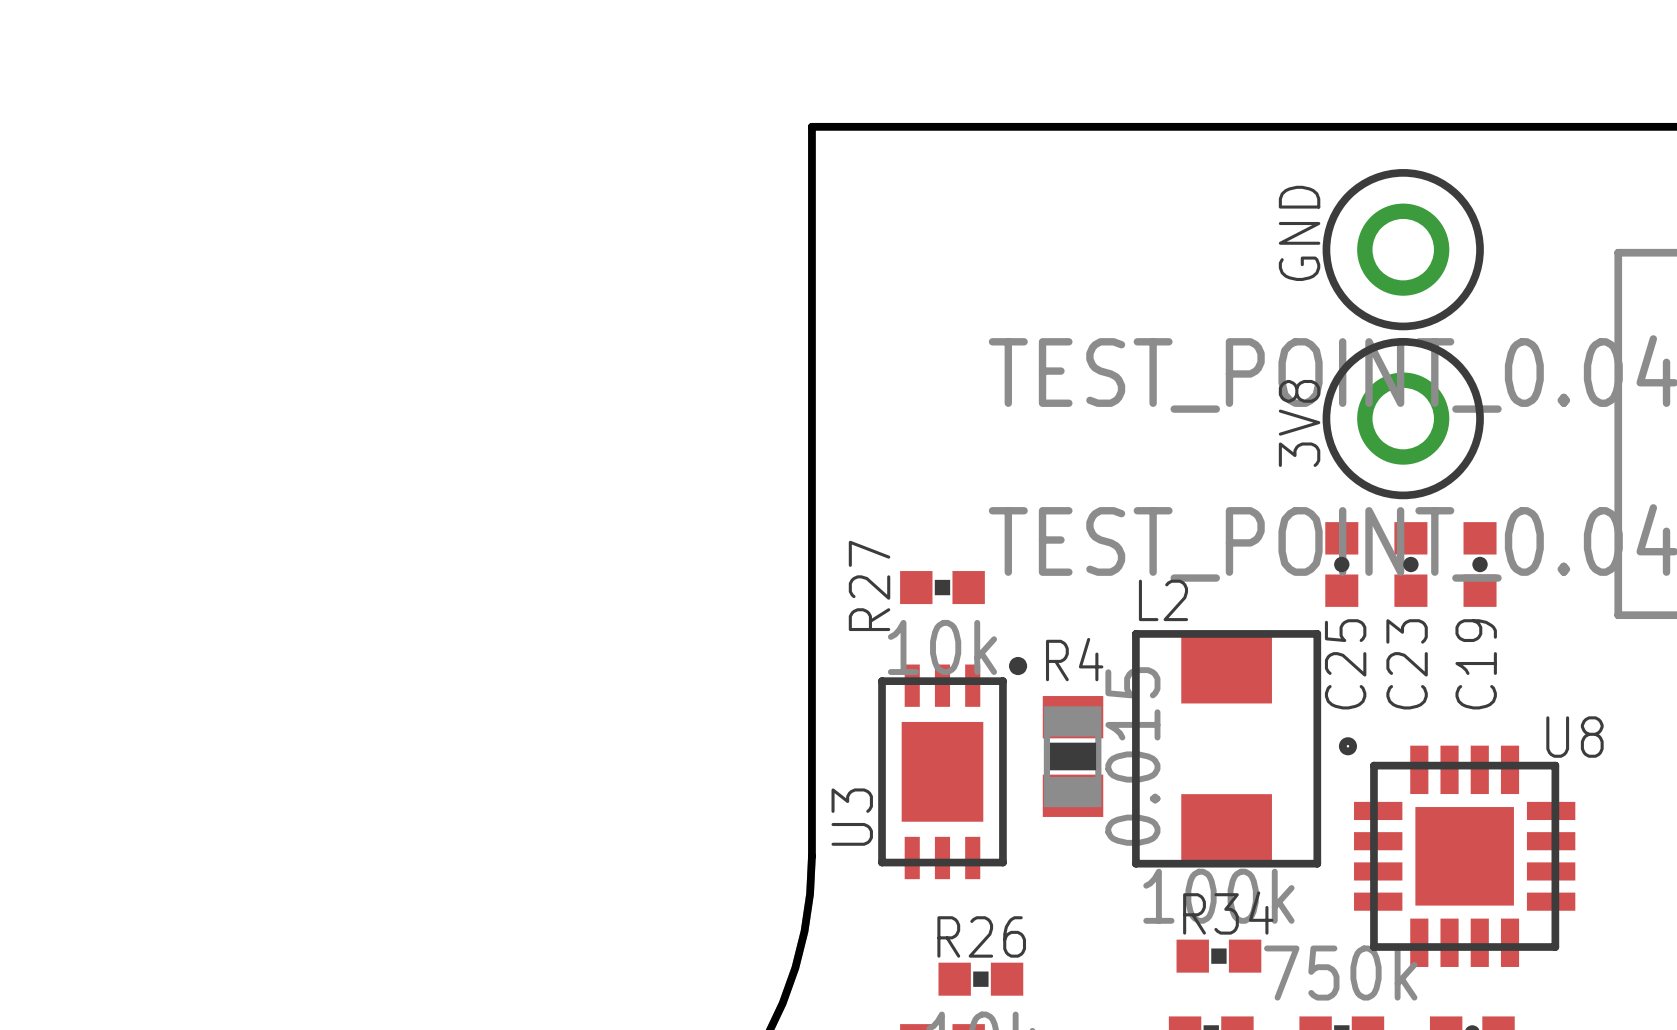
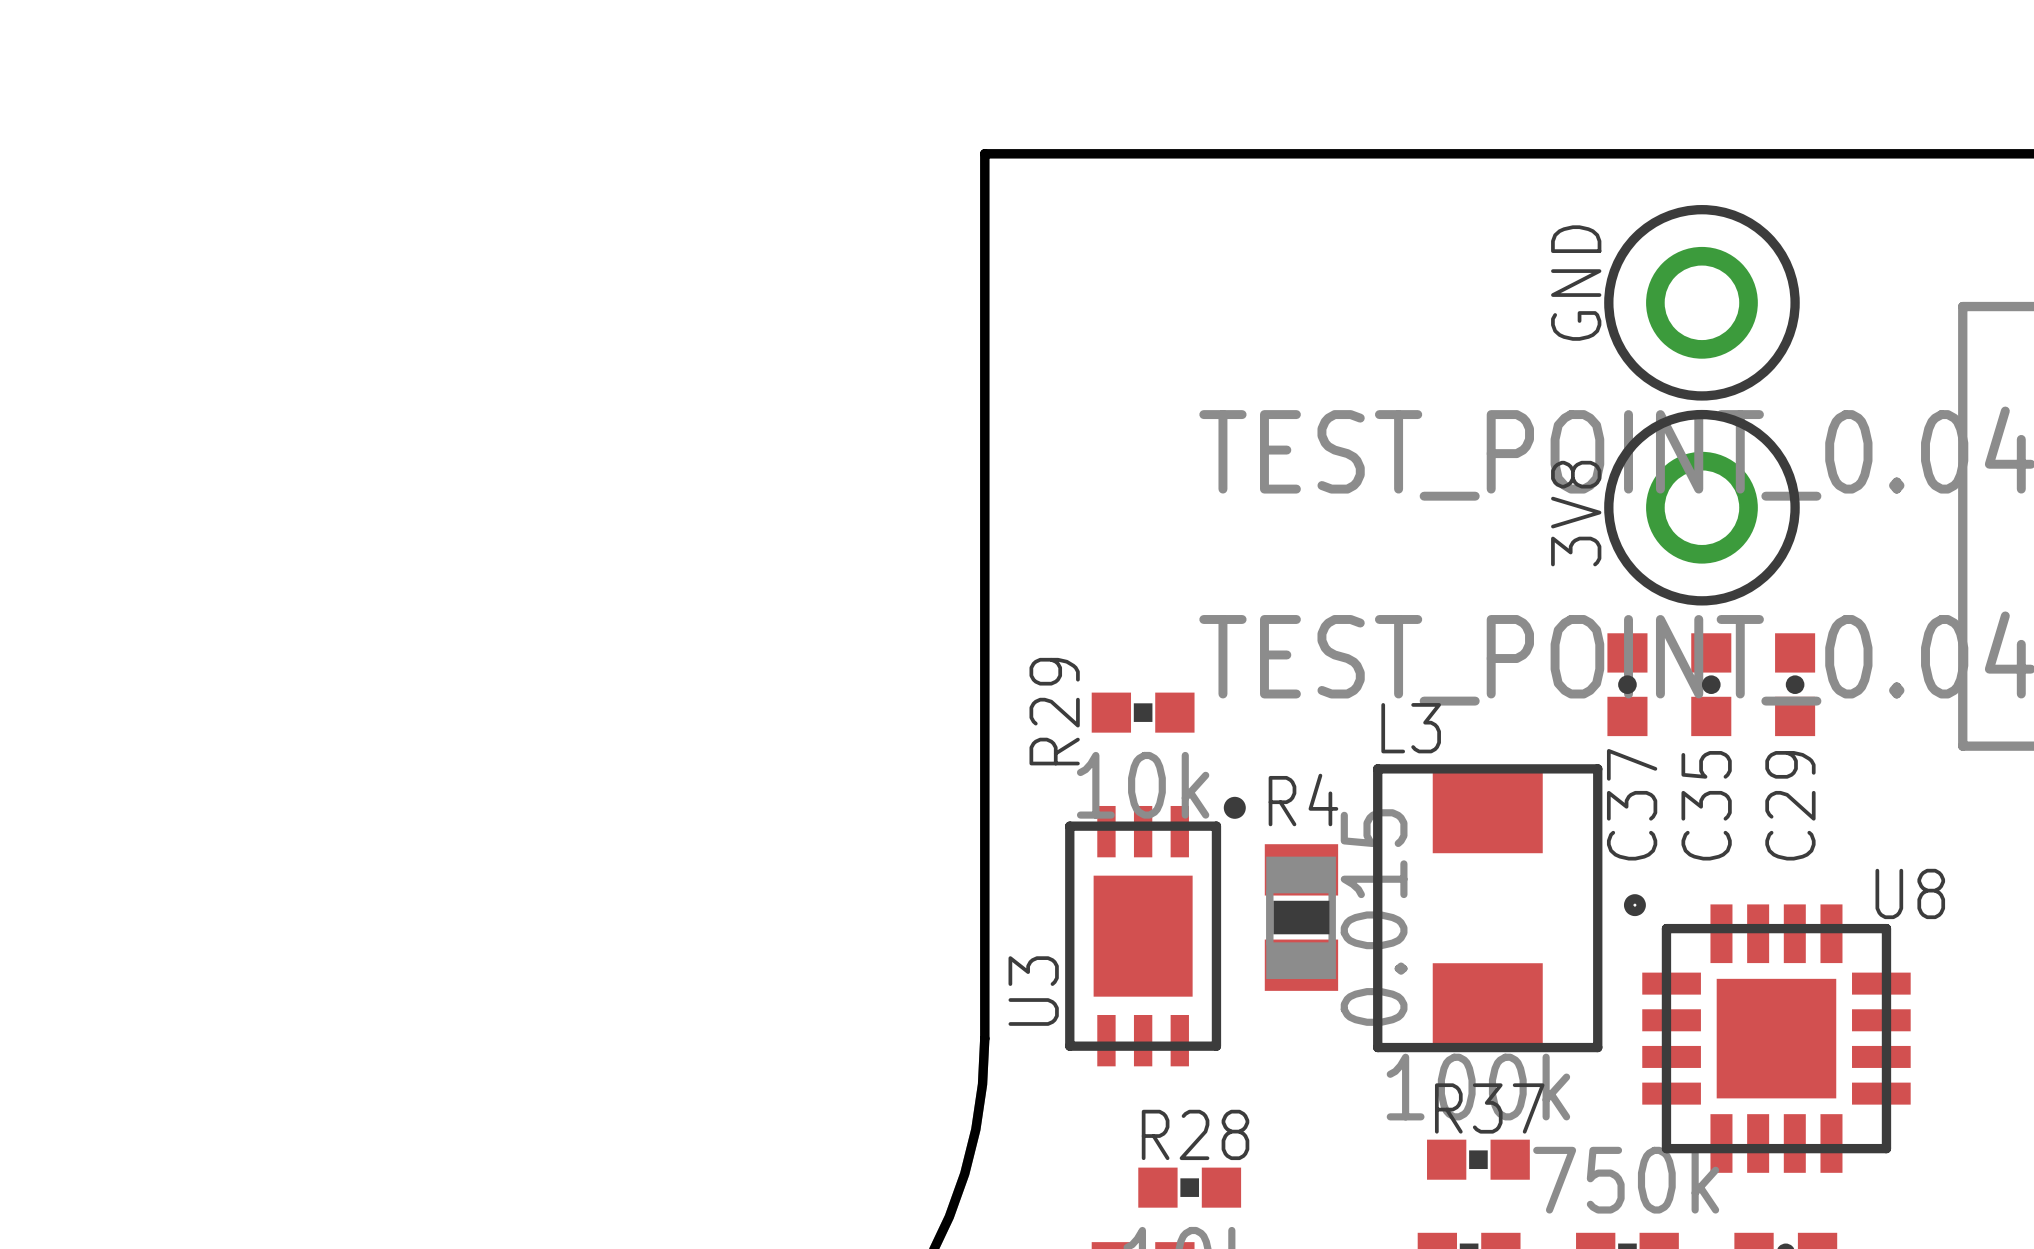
R27 name: R27 (869, 585) -> R29 (1054, 711)
L2 name: L2 (1163, 600) -> L3 (1411, 728)
C25 name: C25 (1345, 664) -> C37 (1632, 804)
C23 name: C23 (1407, 664) -> C35 (1706, 805)
C19 name: C19 (1476, 664) -> C29 (1790, 805)
R34 name: R34 (1228, 912) -> R37 (1489, 1108)
R26 name: R26 (981, 936) -> R28 (1195, 1134)

